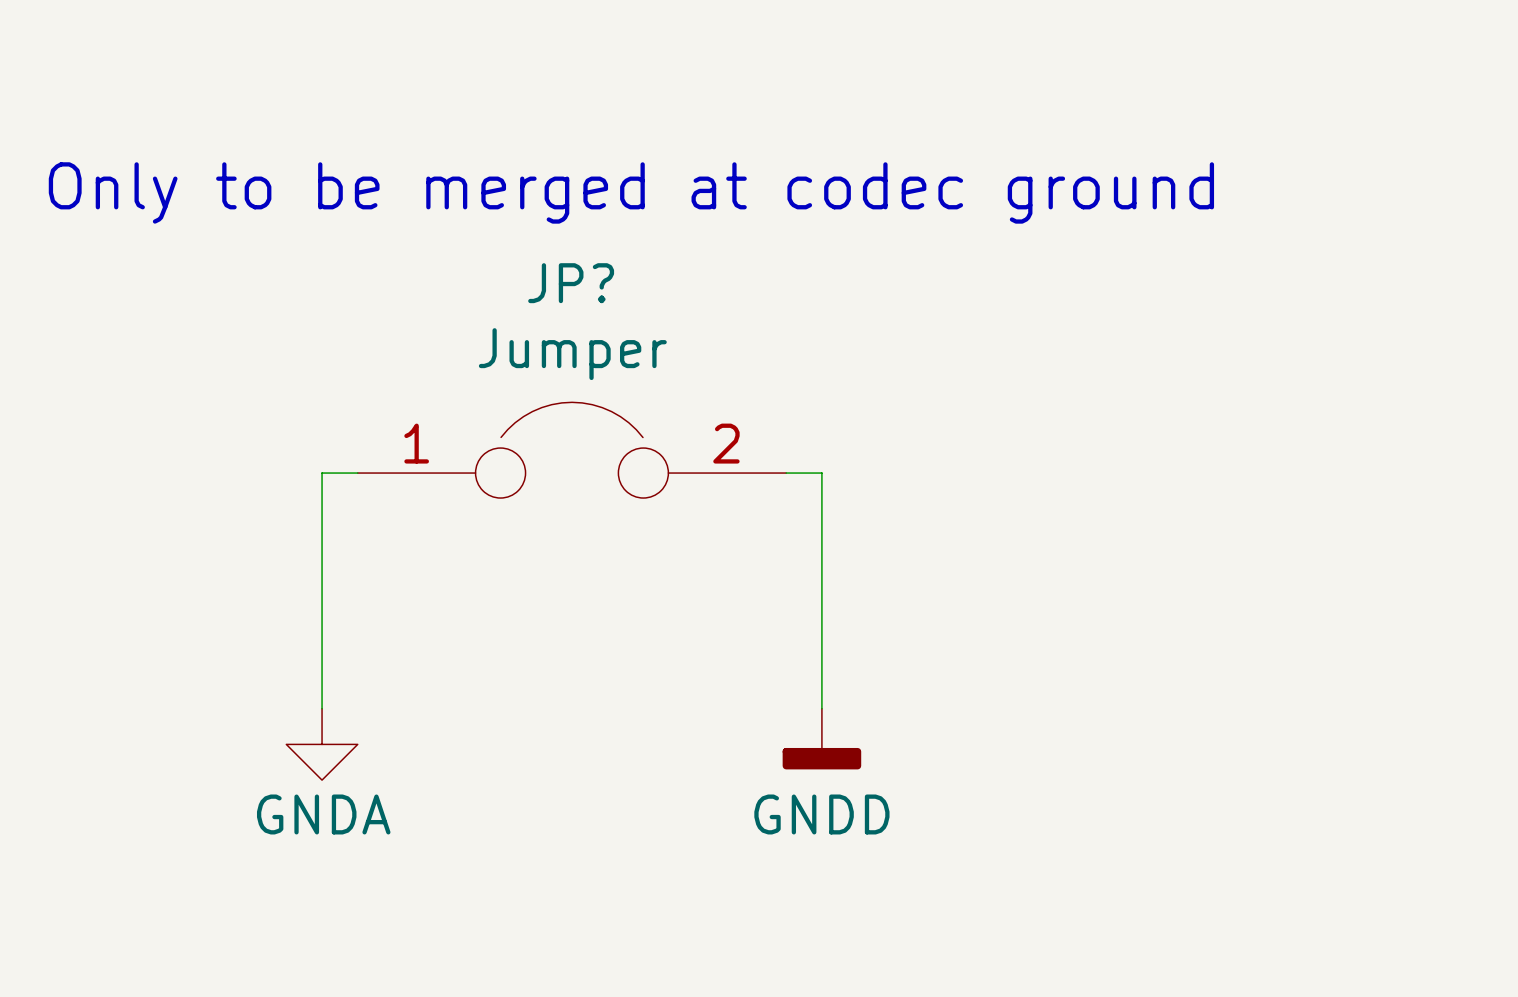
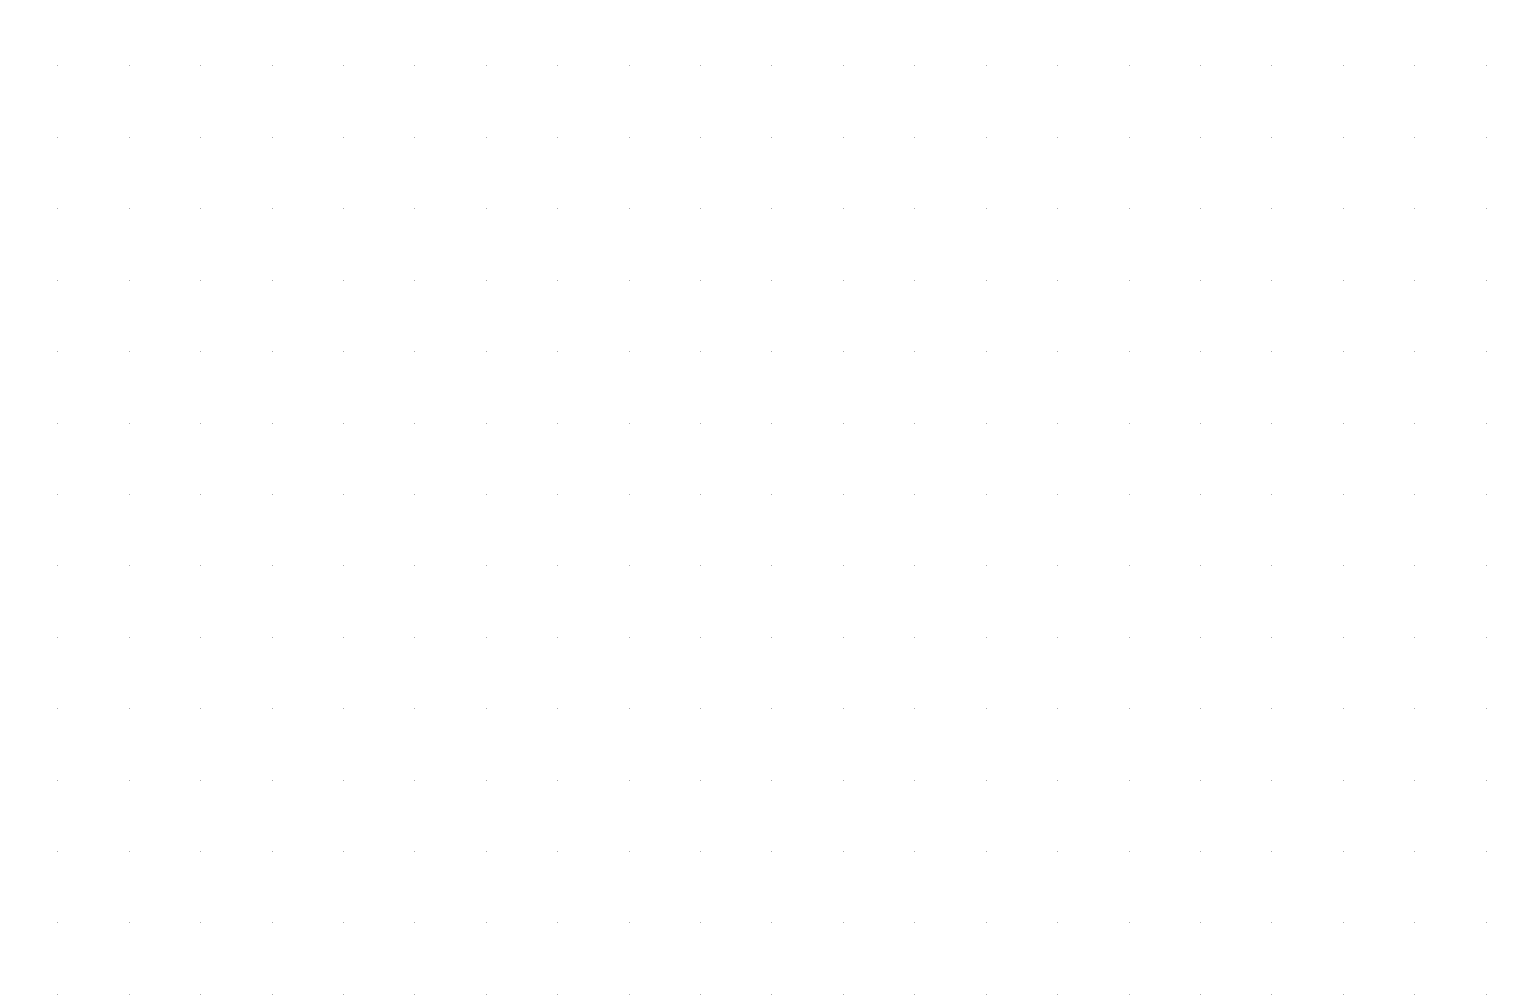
text: Only to be merged at codec ground (631, 192) -> none
JP?: Jumper (571, 450) -> none
wire: (357, 473) (322, 473) (322, 708) -> none
wire: (786, 473) (821, 473) (821, 708) -> none
power symbol: GNDD (821, 739) -> none
power symbol: GNDA (322, 744) -> none

